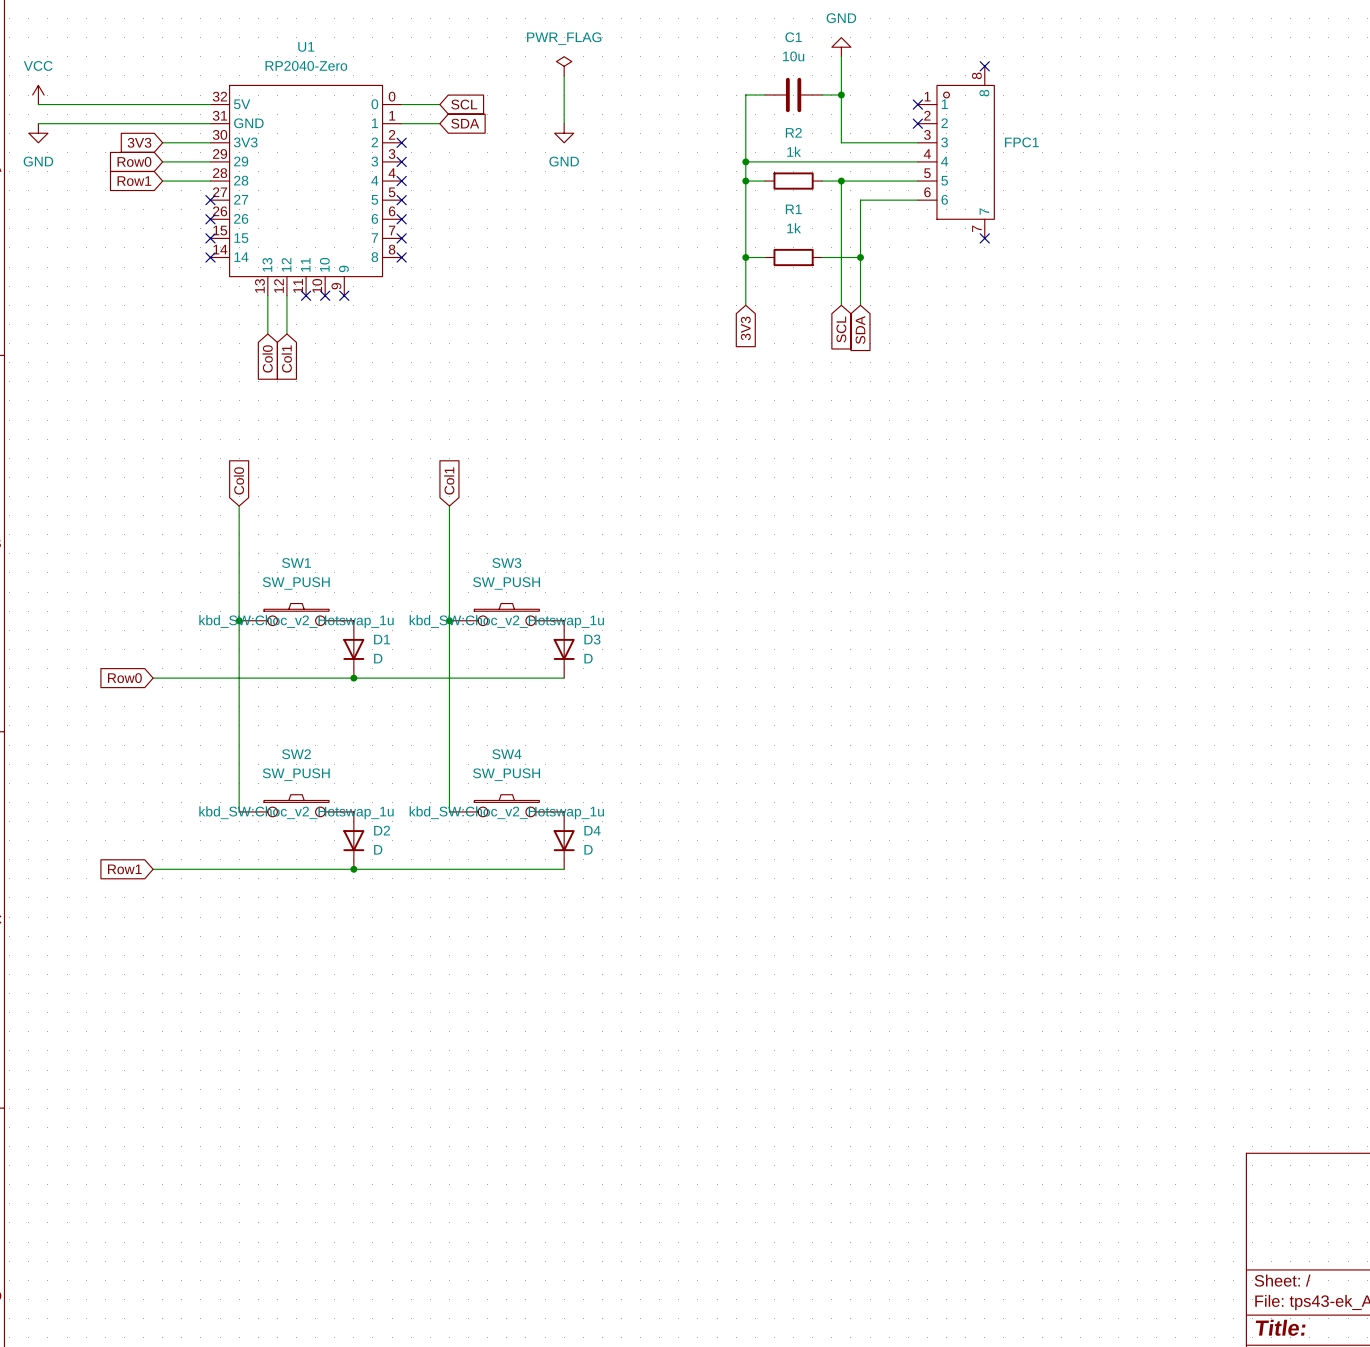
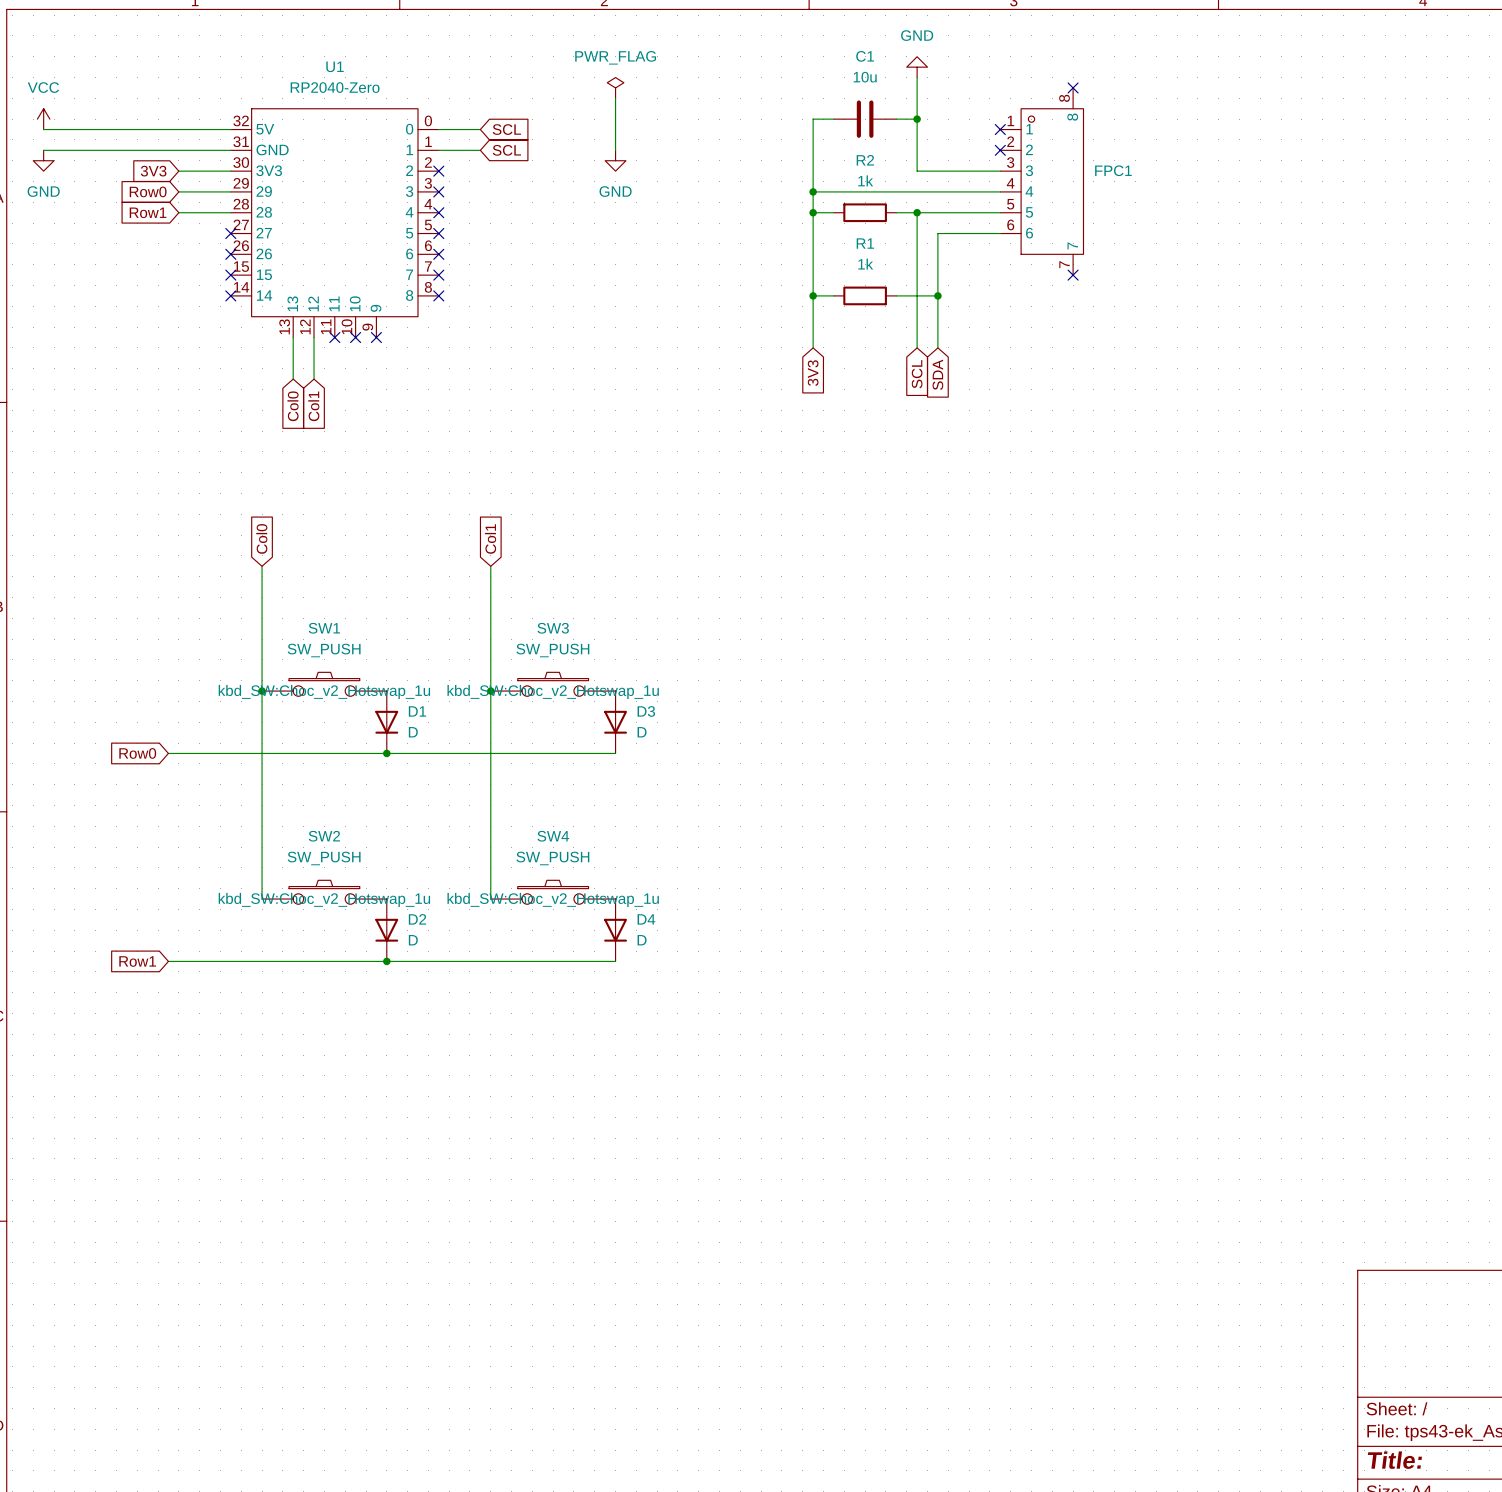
global label: SDA (465, 123) -> SCL (506, 150)

